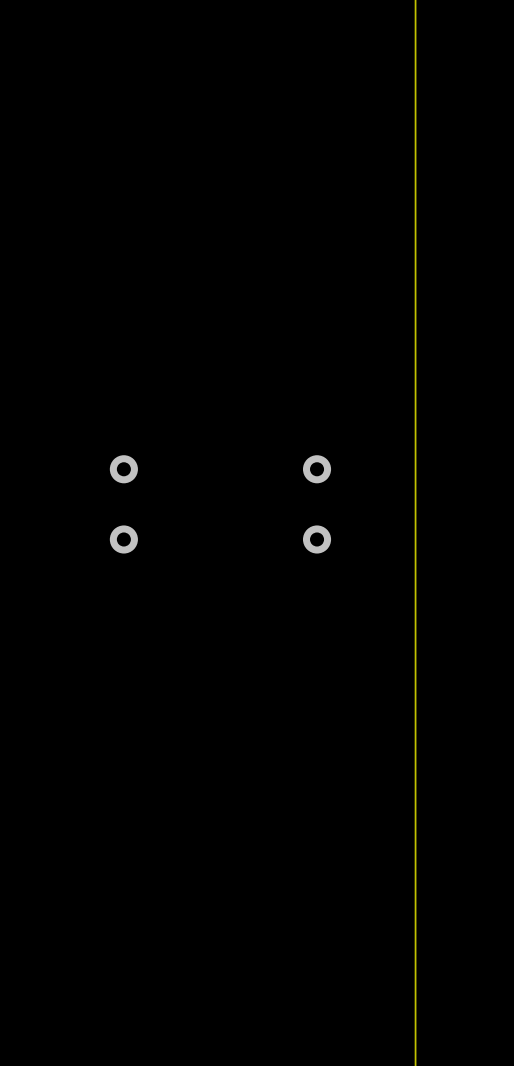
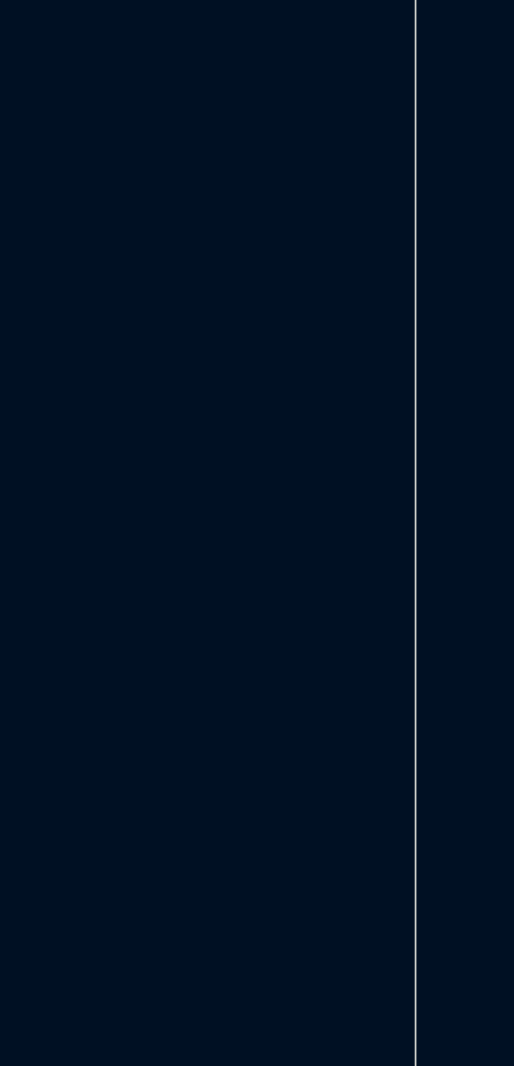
via: (123, 469) -> none
via: (317, 469) -> none
via: (123, 539) -> none
via: (317, 539) -> none

